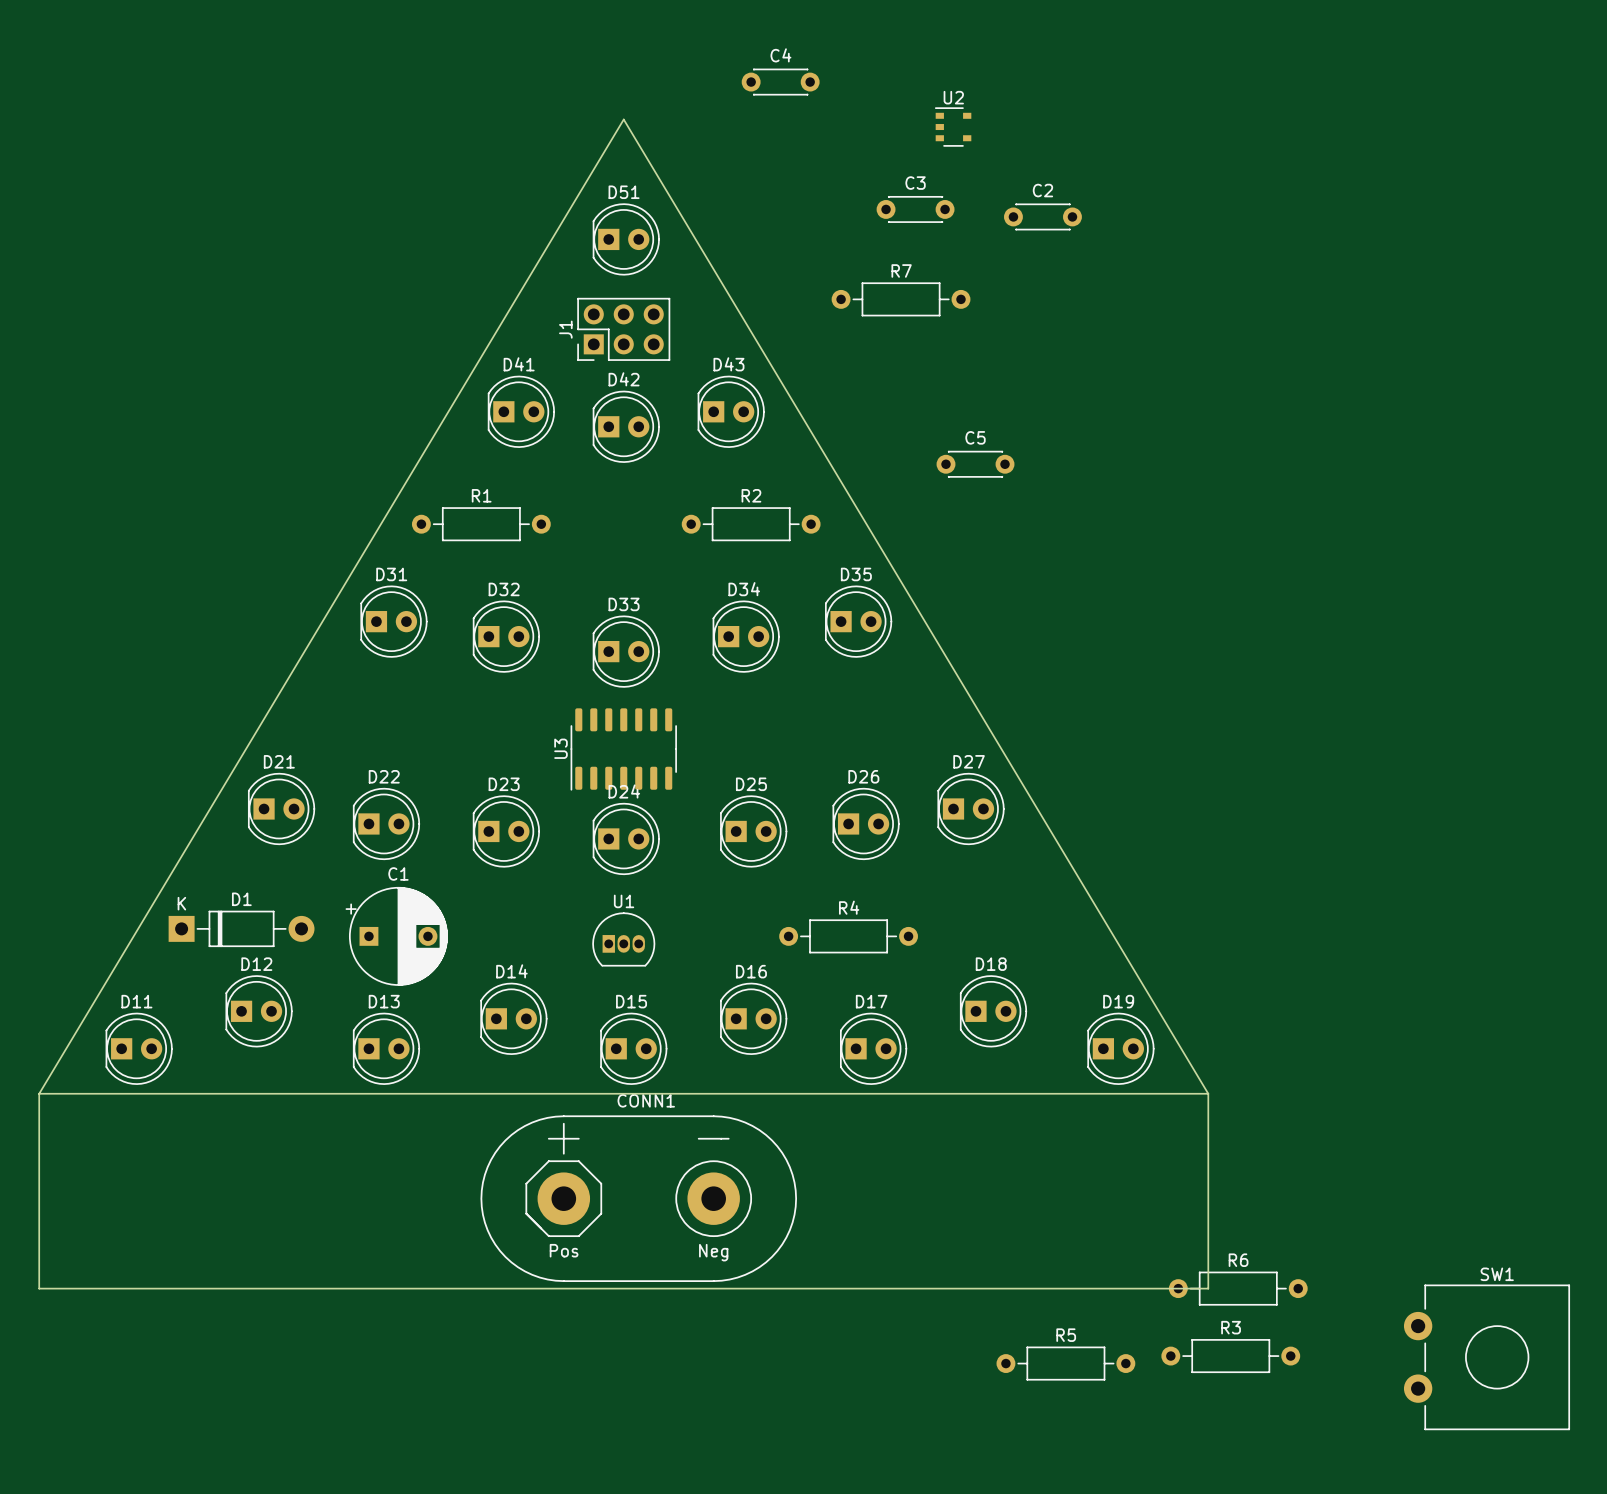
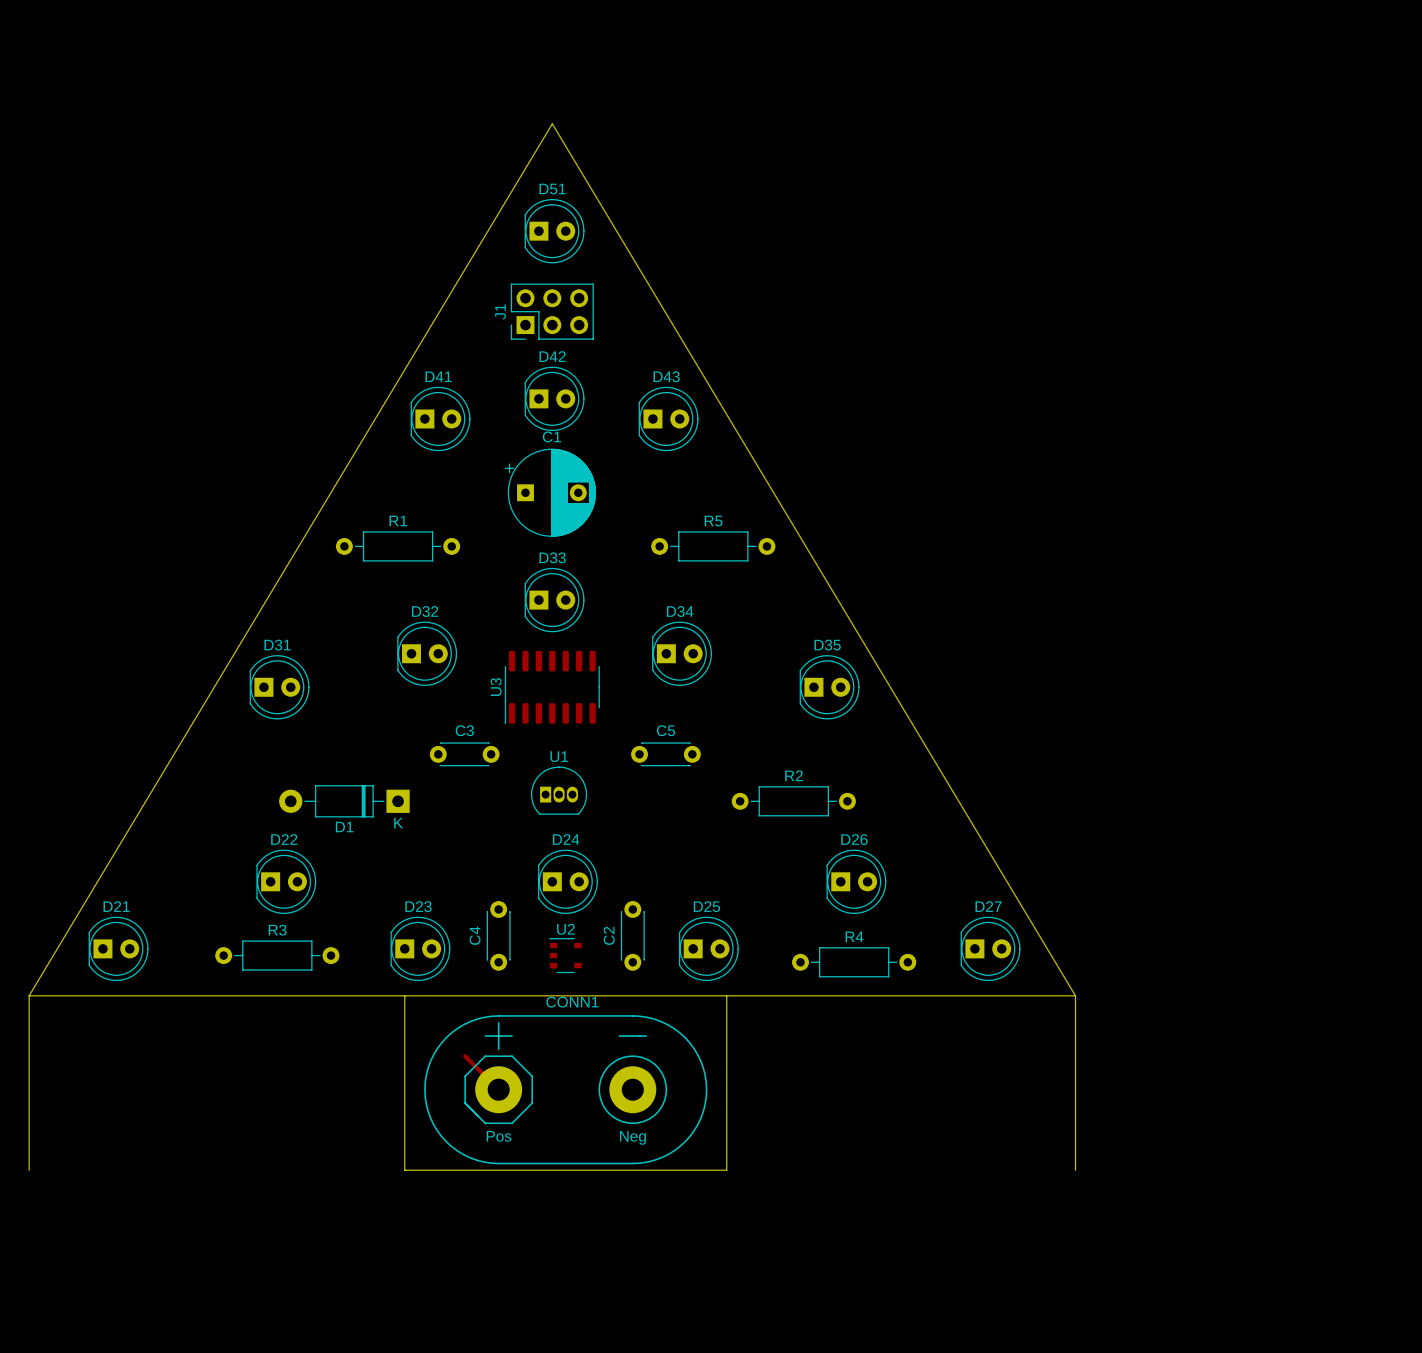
C4 name position: C4 (780, 55) -> C4 (475, 935)
C4 rotation: 0° (780, 82) -> 90° clockwise (498, 935)
C4 position: (780, 82) -> (498, 935)
U2 position: (953, 127) -> (565, 955)
C2 name position: C2 (1042, 190) -> C2 (609, 935)
C3 position: (915, 209) -> (464, 754)
C2 rotation: 0° (1042, 216) -> 90° clockwise (632, 935)
C2 position: (1042, 216) -> (632, 935)
R7: (901, 299) -> none
D41 footprint: [487, 375, 555, 448] -> [410, 386, 471, 452]
D43 footprint: [697, 375, 765, 448] -> [638, 386, 699, 452]
C5 position: (975, 464) -> (665, 754)
R1 position: (481, 524) -> (398, 546)
R2 position: (751, 524) -> (793, 801)
D31 footprint: [360, 585, 428, 658] -> [249, 655, 310, 720]
D35 footprint: [825, 585, 893, 658] -> [799, 655, 860, 720]
D32 position: (506, 636) -> (427, 653)
D34 position: (746, 636) -> (682, 653)
D21 footprint: [248, 772, 316, 845] -> [88, 916, 149, 982]
D27 footprint: [937, 772, 1005, 845] -> [960, 916, 1021, 982]
D22 footprint: [353, 787, 420, 860] -> [256, 849, 317, 915]
D26 footprint: [832, 787, 900, 860] -> [826, 849, 887, 915]
D24 footprint: [592, 802, 660, 875] -> [538, 849, 598, 915]
D23 position: (506, 831) -> (420, 948)
D25 position: (753, 831) -> (708, 948)
D1 rotation: 0° (241, 928) -> 180° (344, 801)
D1 position: (241, 928) -> (344, 801)
C1 position: (396, 936) -> (550, 492)
R4 position: (848, 936) -> (854, 962)
U1 position: (623, 939) -> (559, 790)
D12: (259, 1011) -> none
D18: (993, 1011) -> none
D14: (513, 1018) -> none
D16: (753, 1018) -> none
D11: (139, 1048) -> none
D13: (386, 1048) -> none
D15: (633, 1048) -> none
D17: (873, 1048) -> none
D19: (1120, 1048) -> none
track: none -> (465, 1056) (498, 1089)
board edge: (39, 1288) (458, 1288) -> (404, 995) (404, 1170)
board edge: (818, 1288) (1208, 1288) -> (726, 1170) (726, 995)
R6: (1238, 1288) -> none
R3 position: (1230, 1356) -> (277, 955)
SW1: (1486, 1357) -> none
R5 position: (1065, 1363) -> (713, 546)

